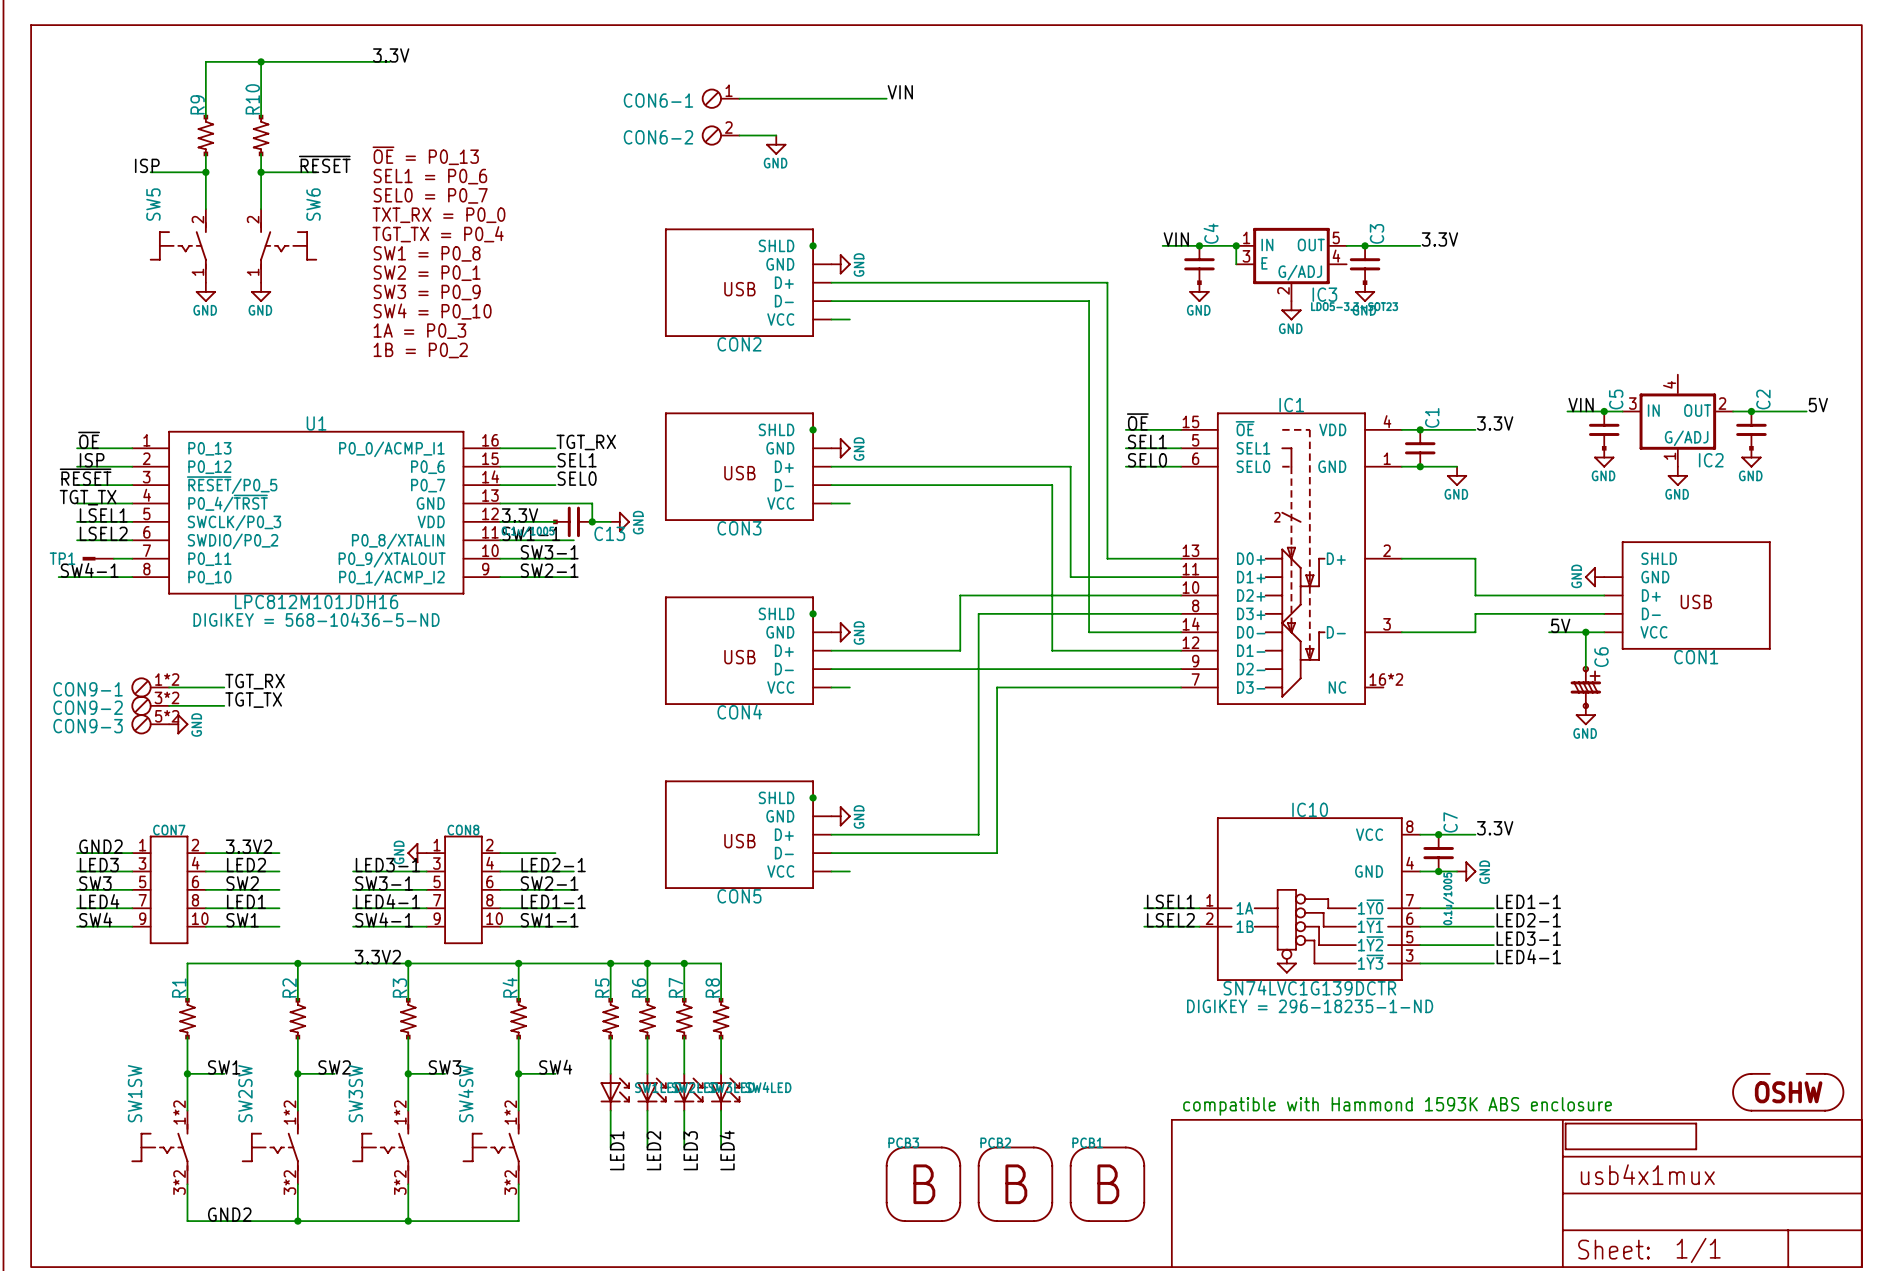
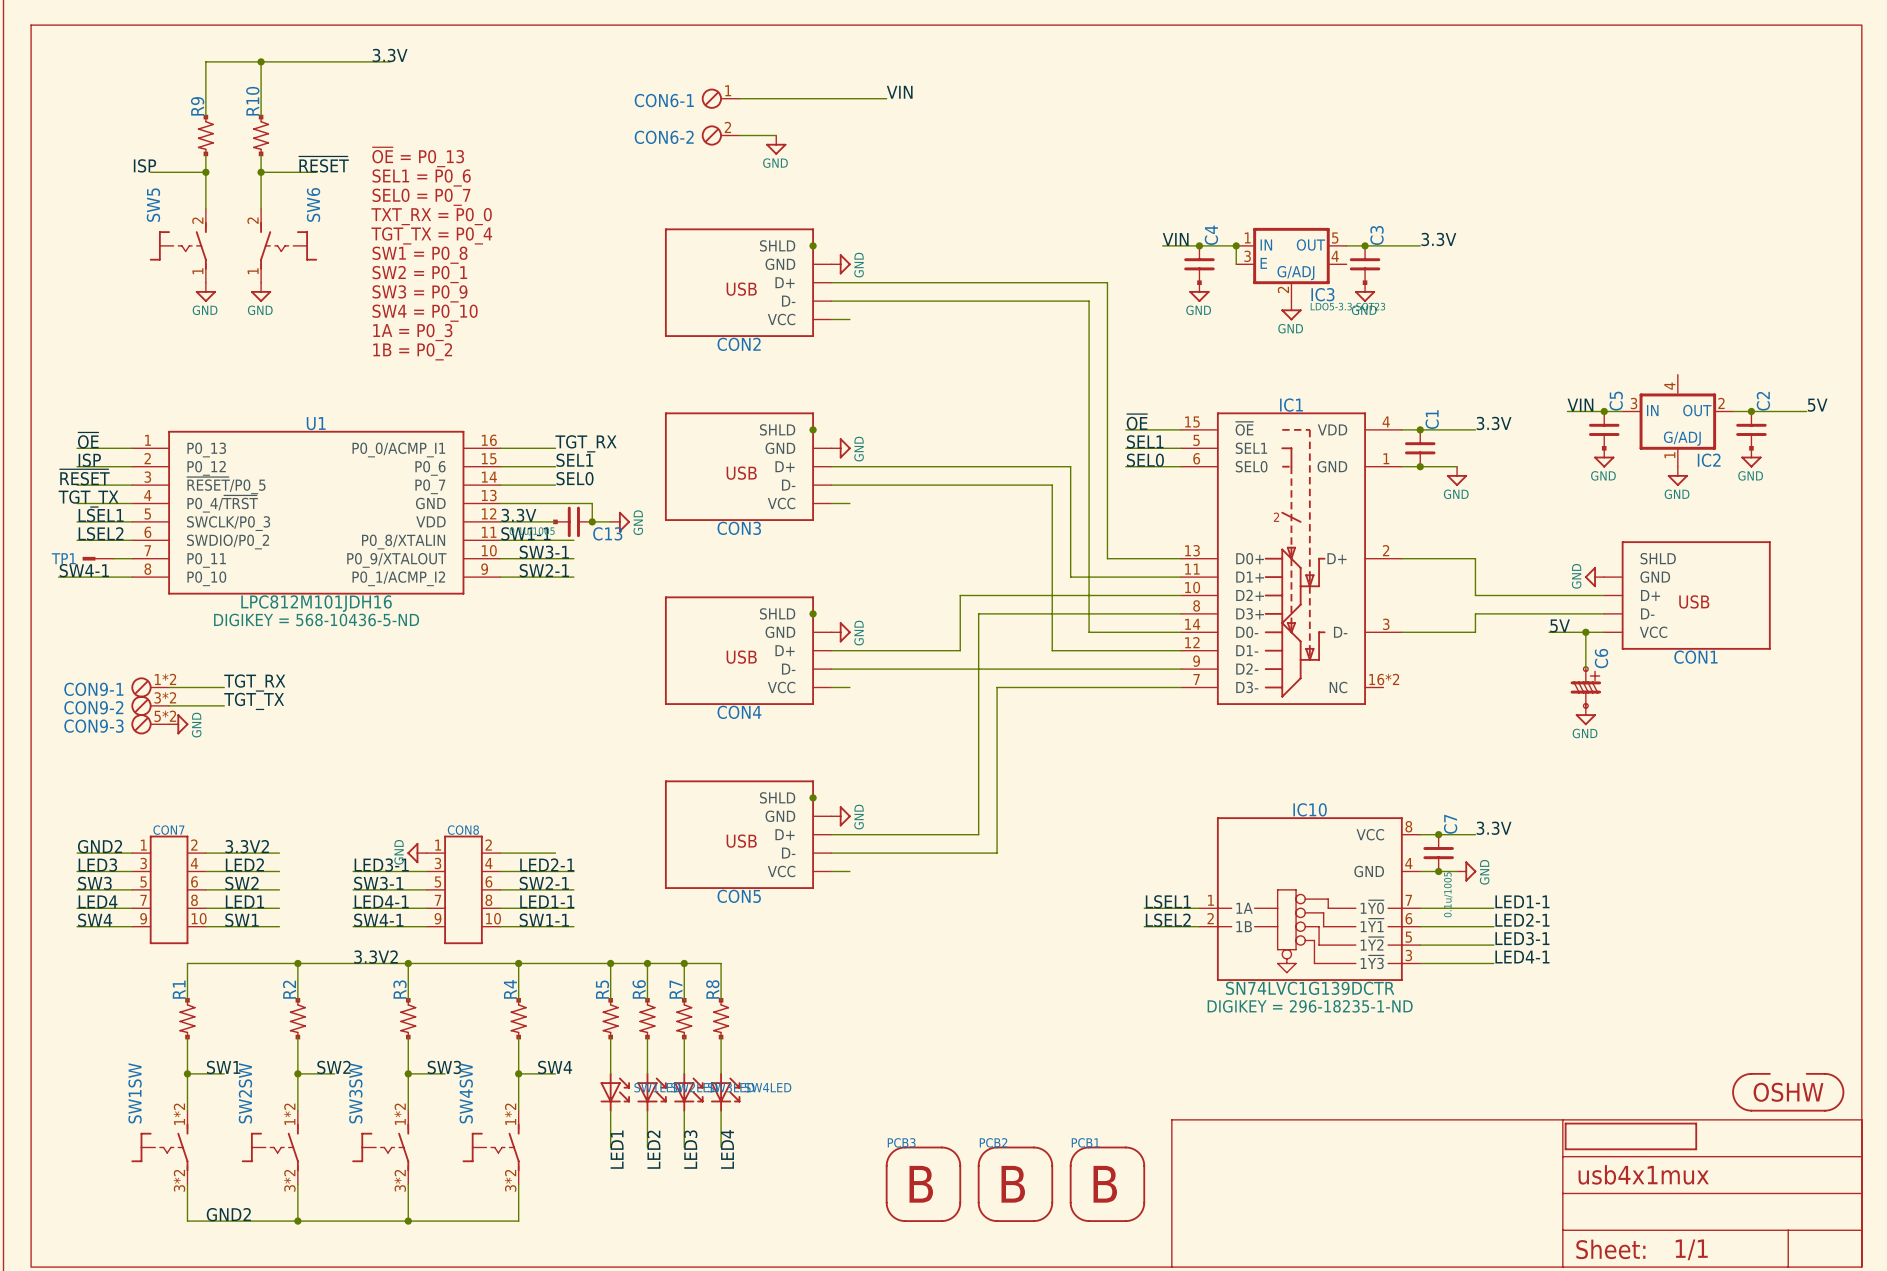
text: compatible with Hammond 1593K ABS enclosure (1397, 1106) -> none

